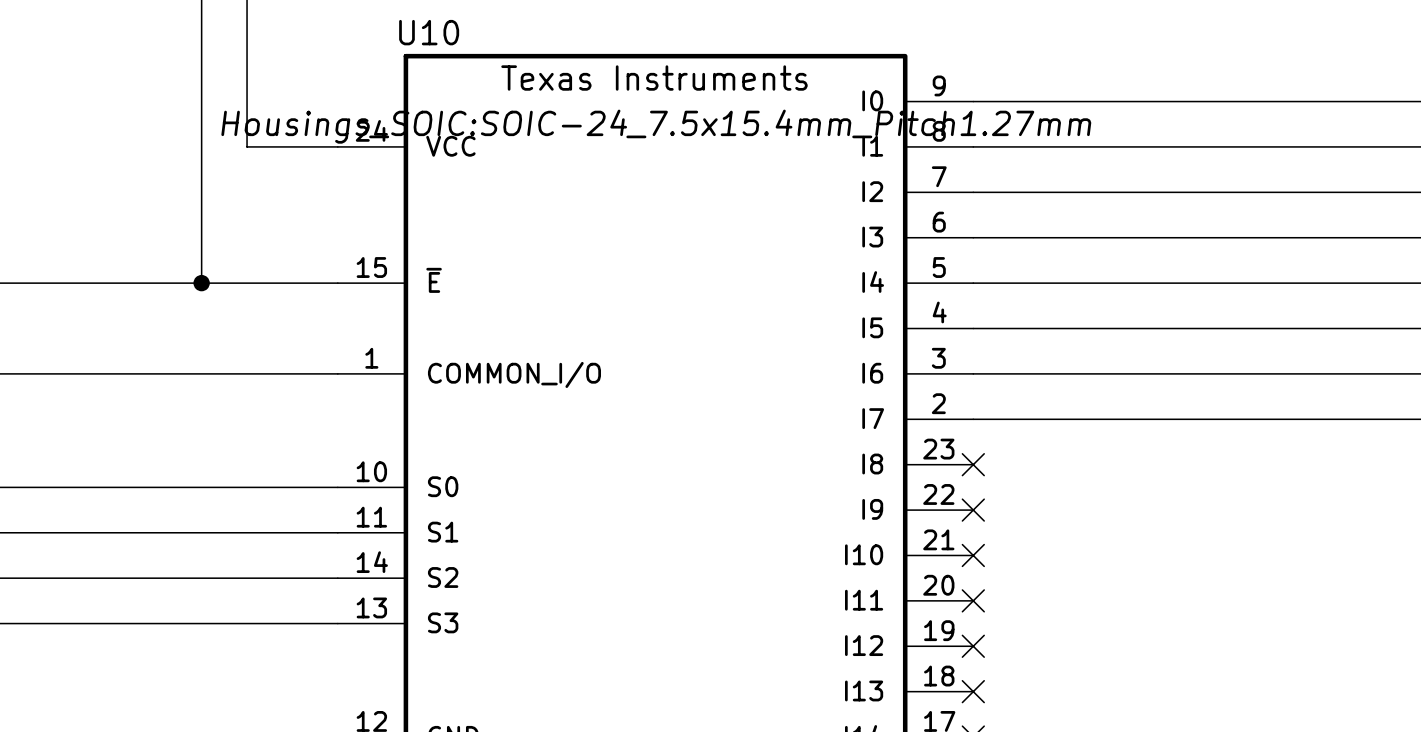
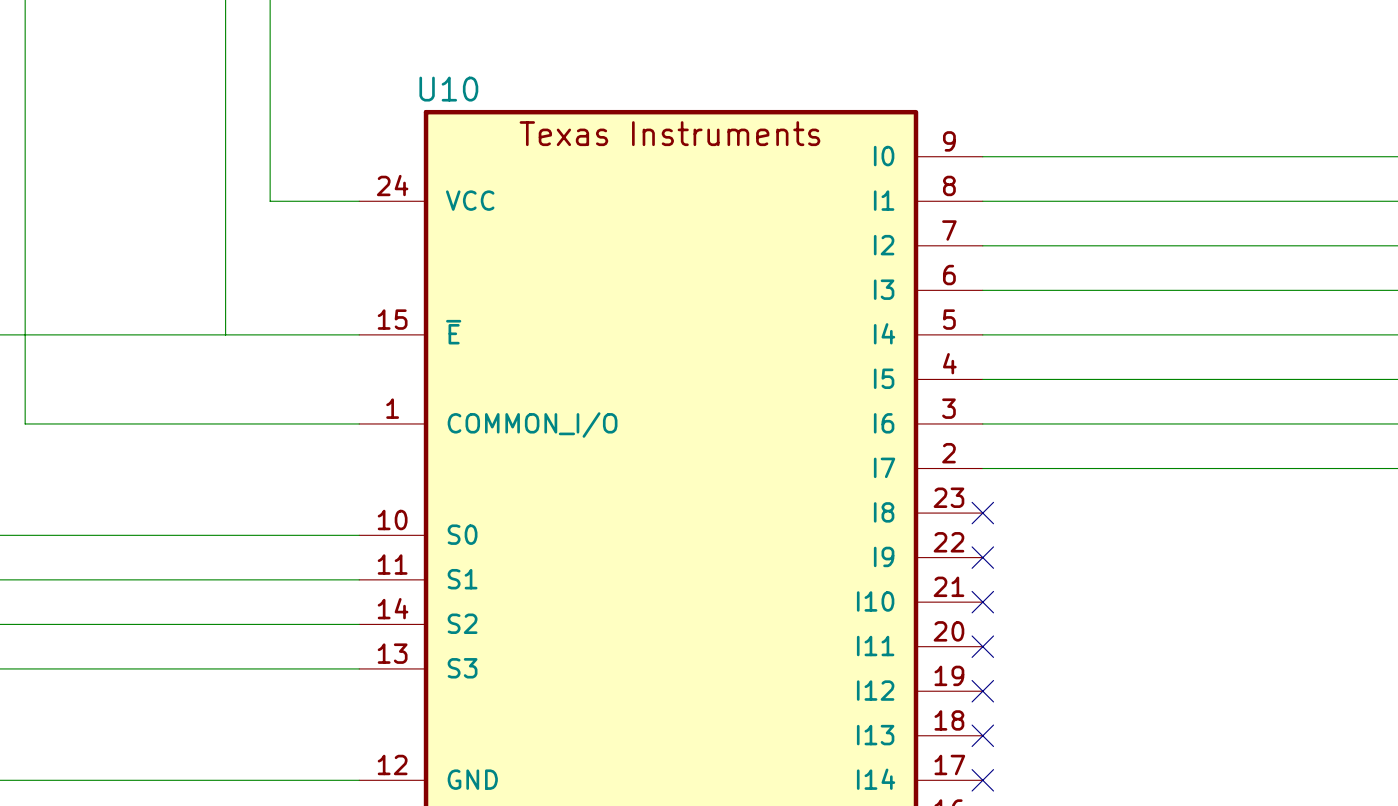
U10 text: Housings_SOIC:SOIC-24_7.5x15.4mm_Pitch1.27mm (656, 126) -> none
junction: (201, 283) -> none

